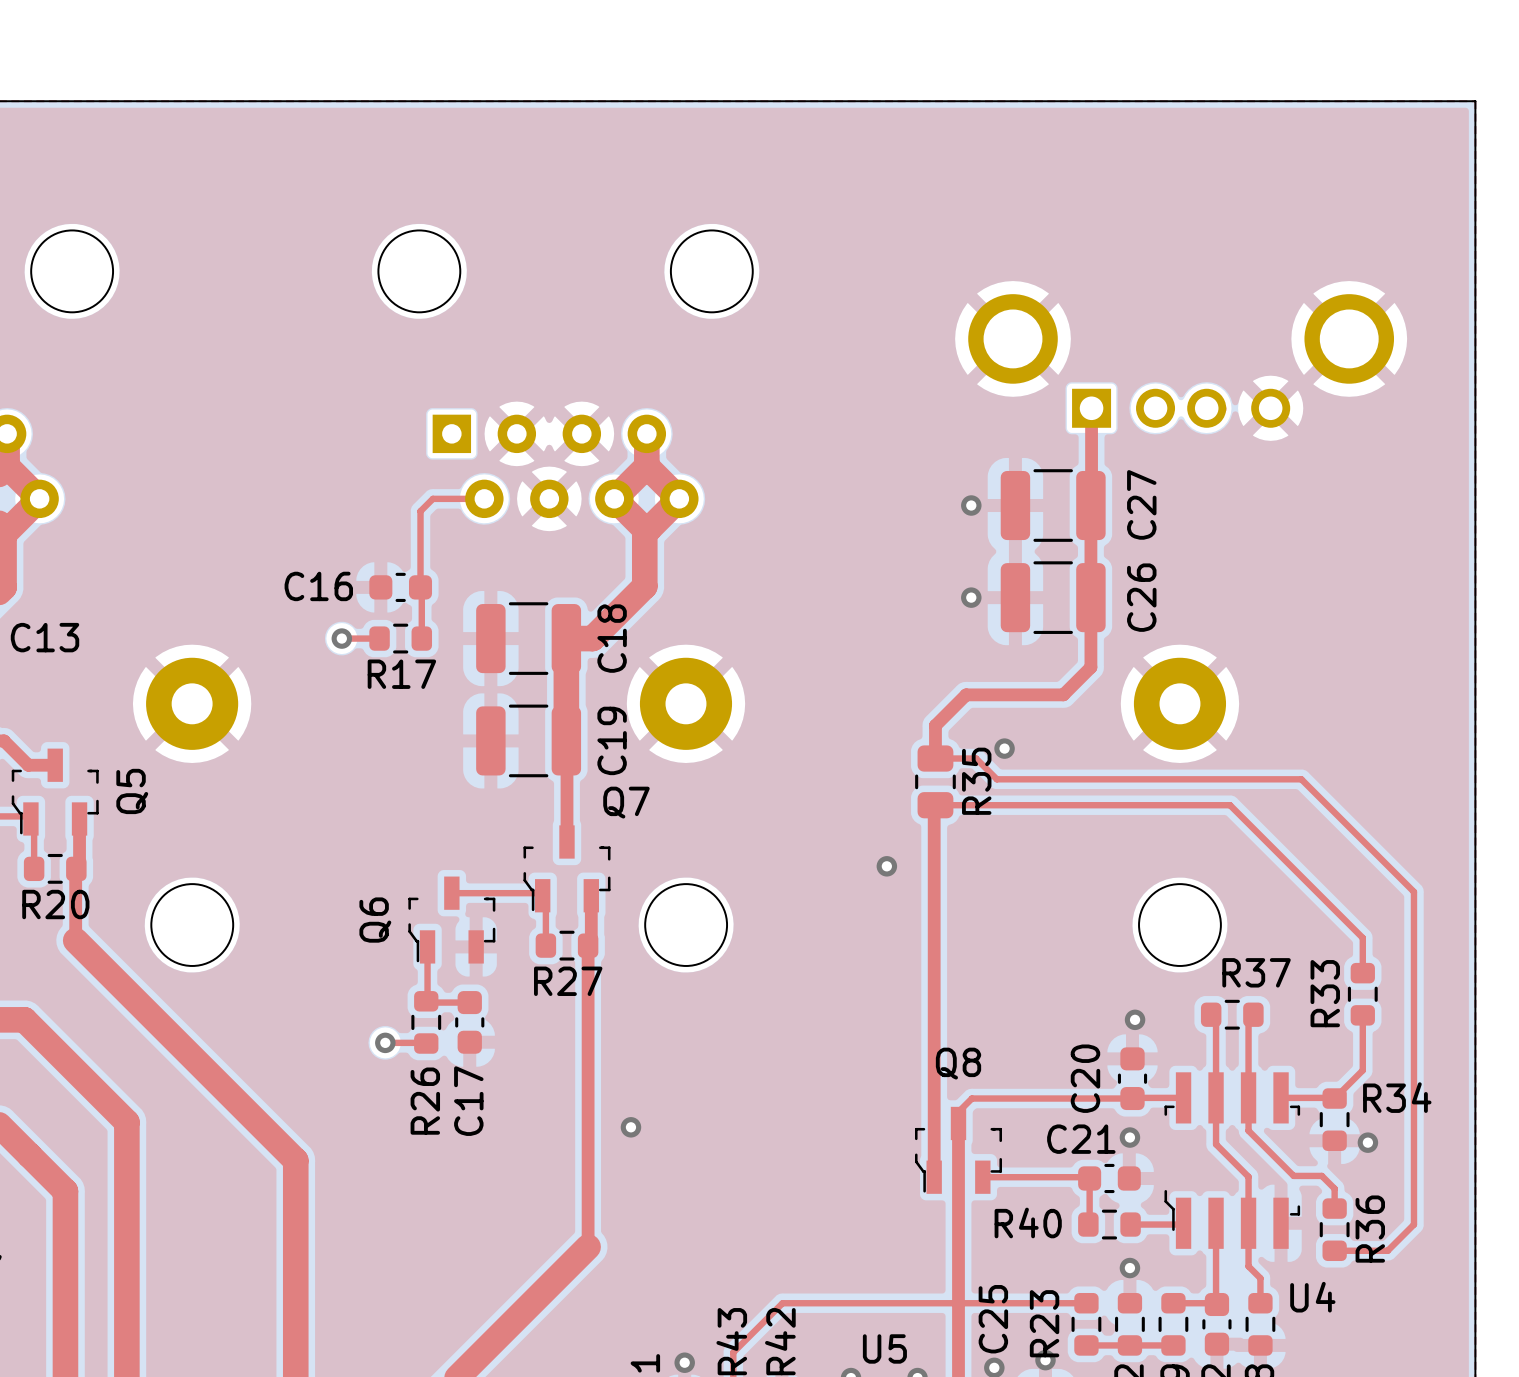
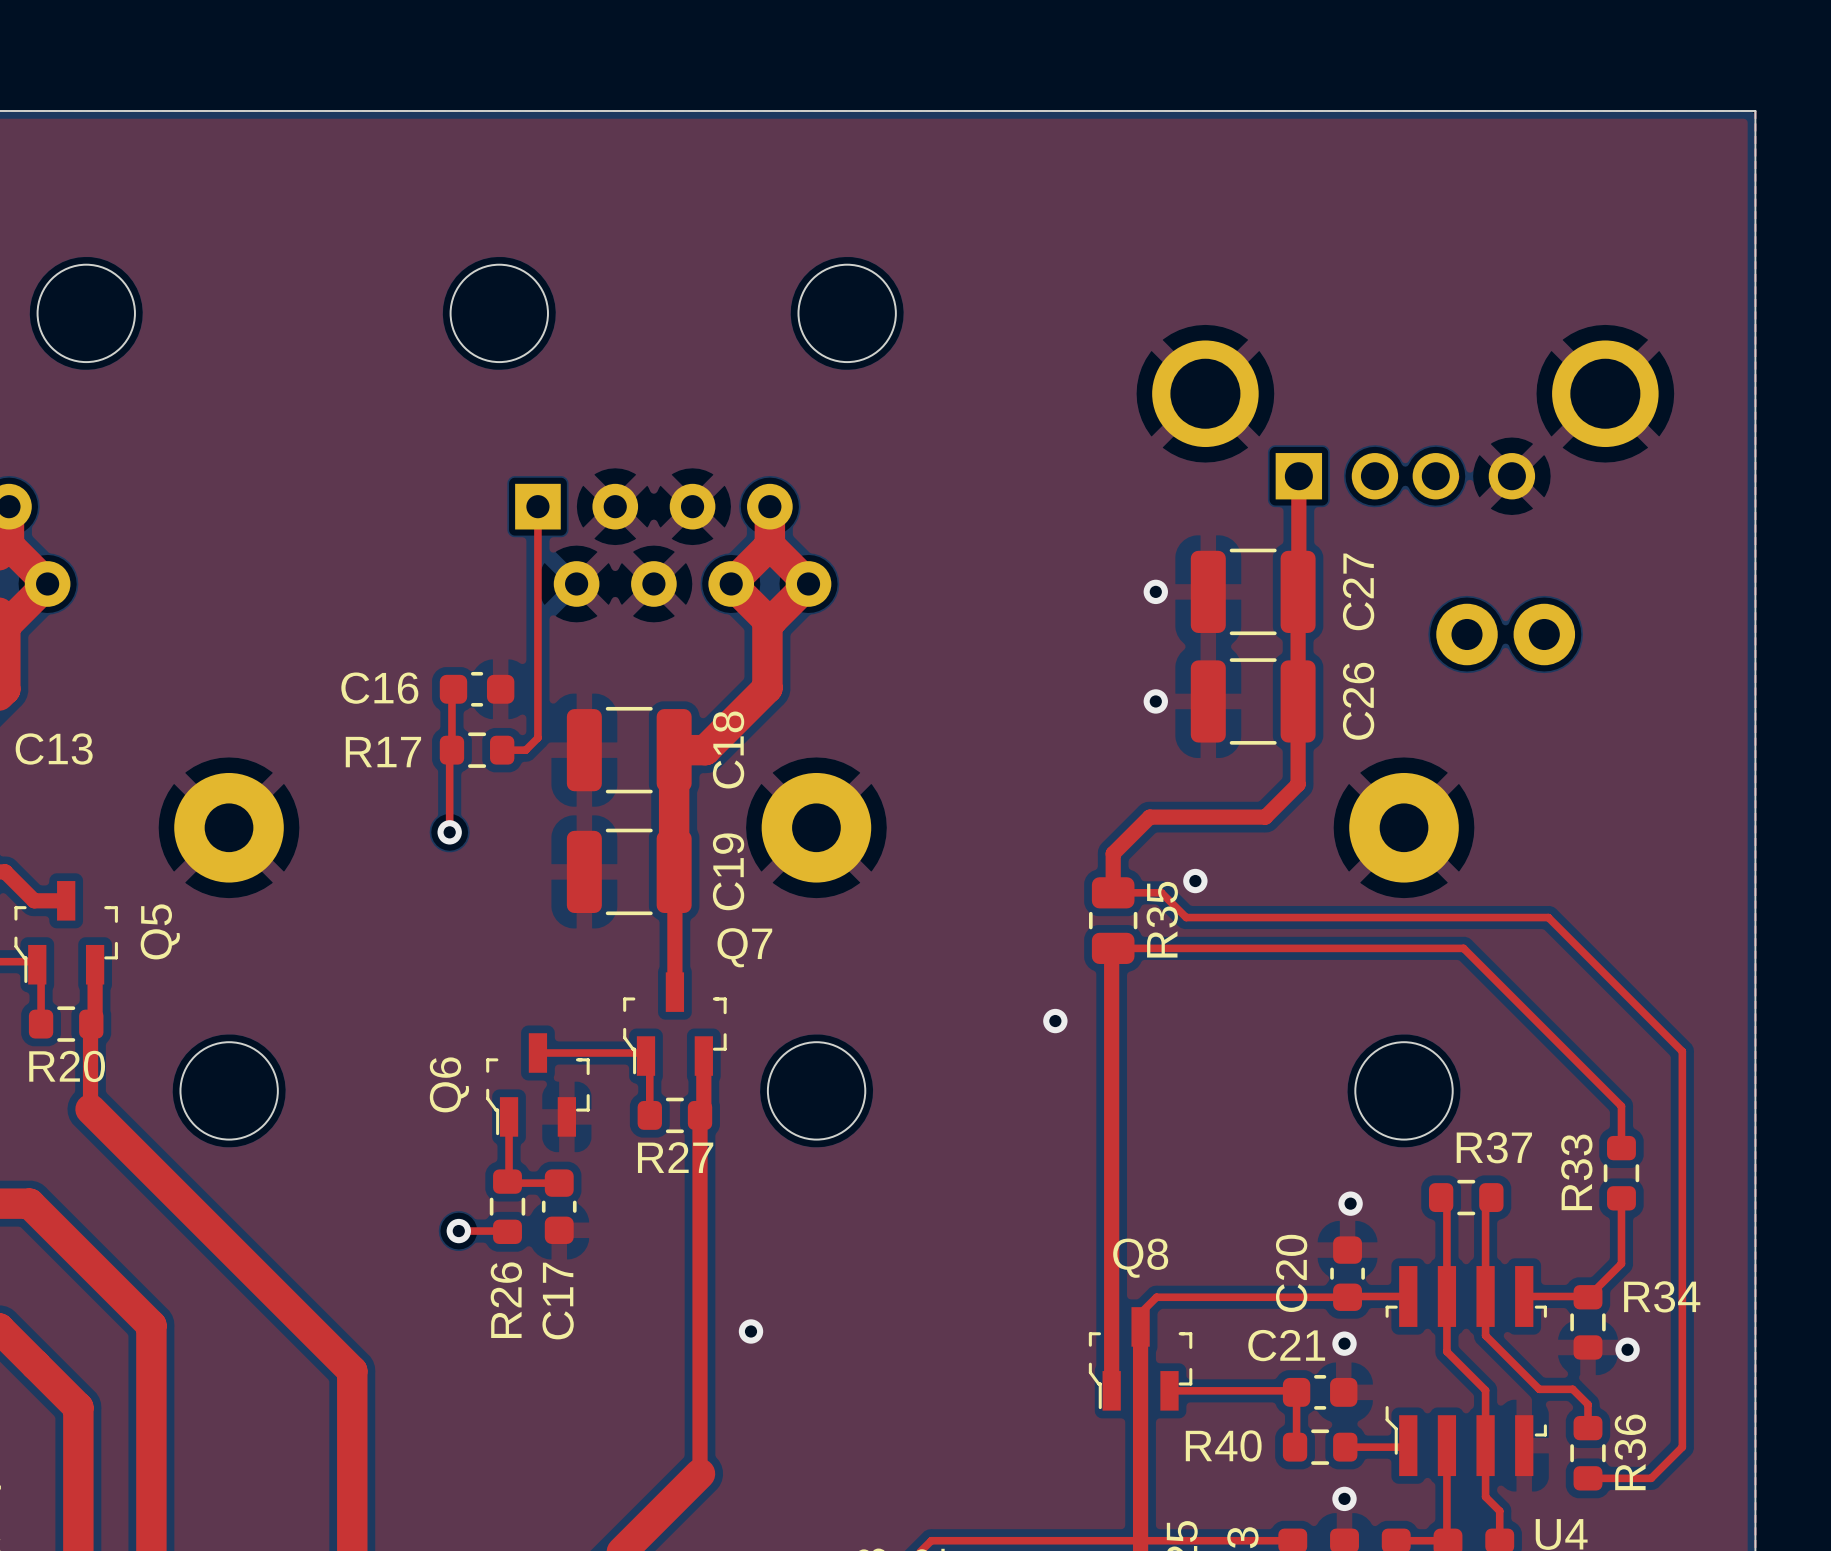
top track: (484, 498) (432, 498) (420, 511) (421, 638) -> (537, 506) (537, 737) (525, 750) (502, 750)
part: none -> (1505, 634)
top track: none -> (453, 689) (451, 750) (449, 752) (449, 832)
top track: (341, 638) (379, 638) -> none
via position: (341, 638) -> (449, 832)
R17 name position: R17 (401, 674) -> R17 (383, 752)

